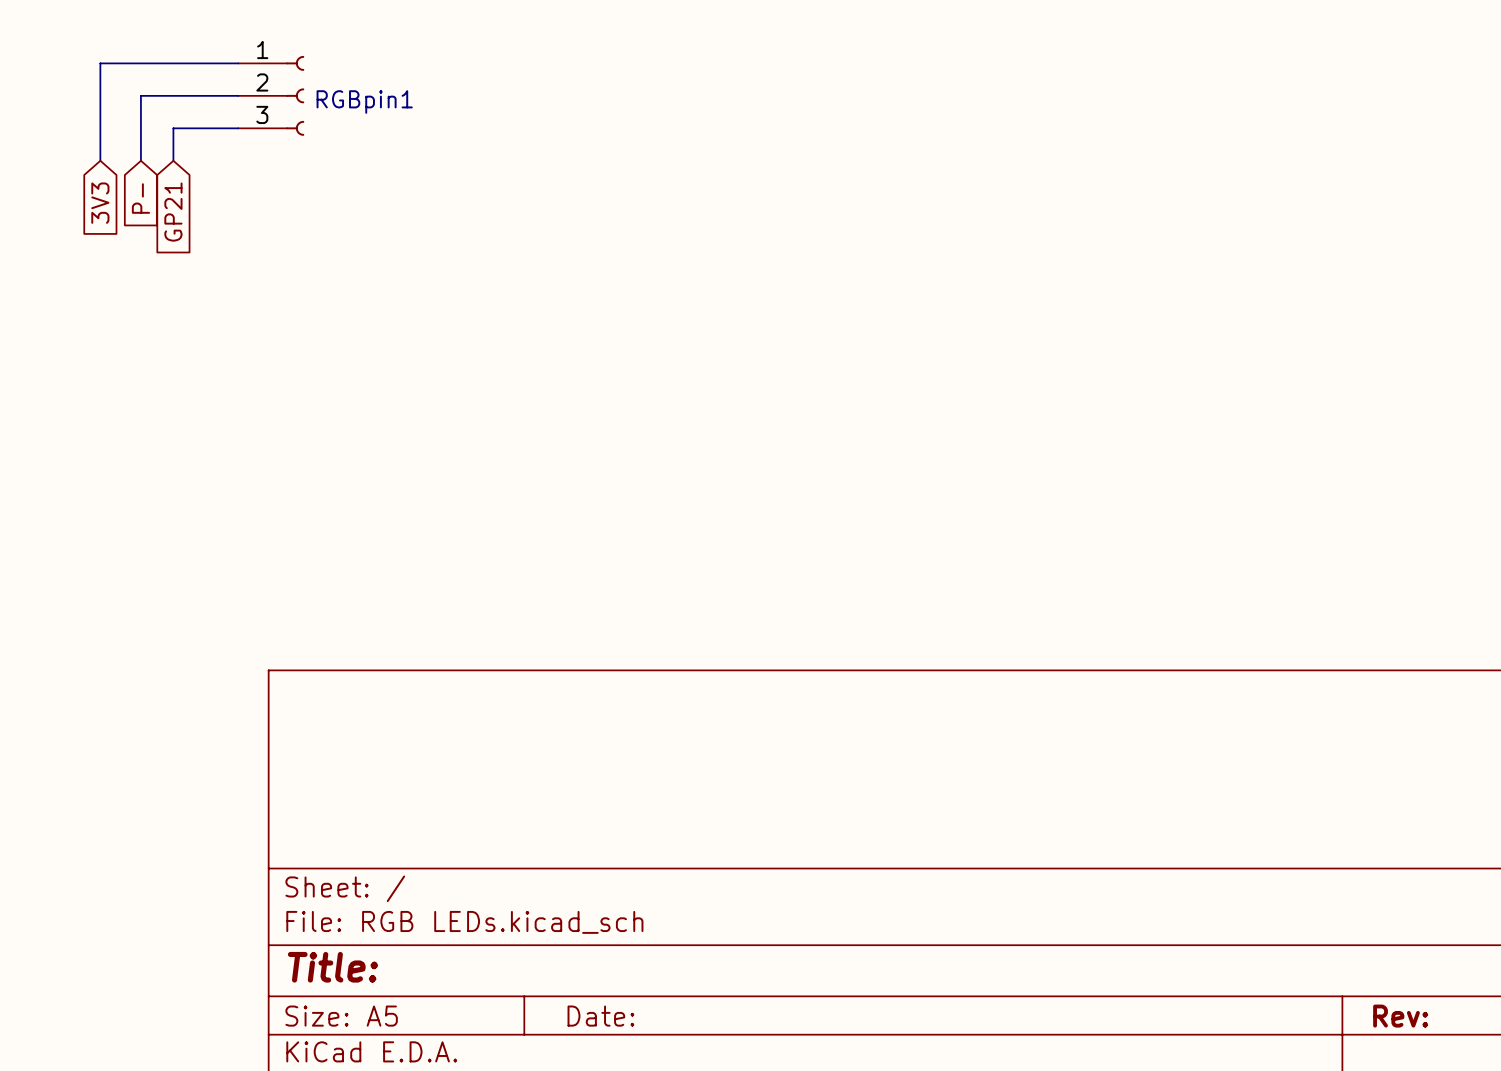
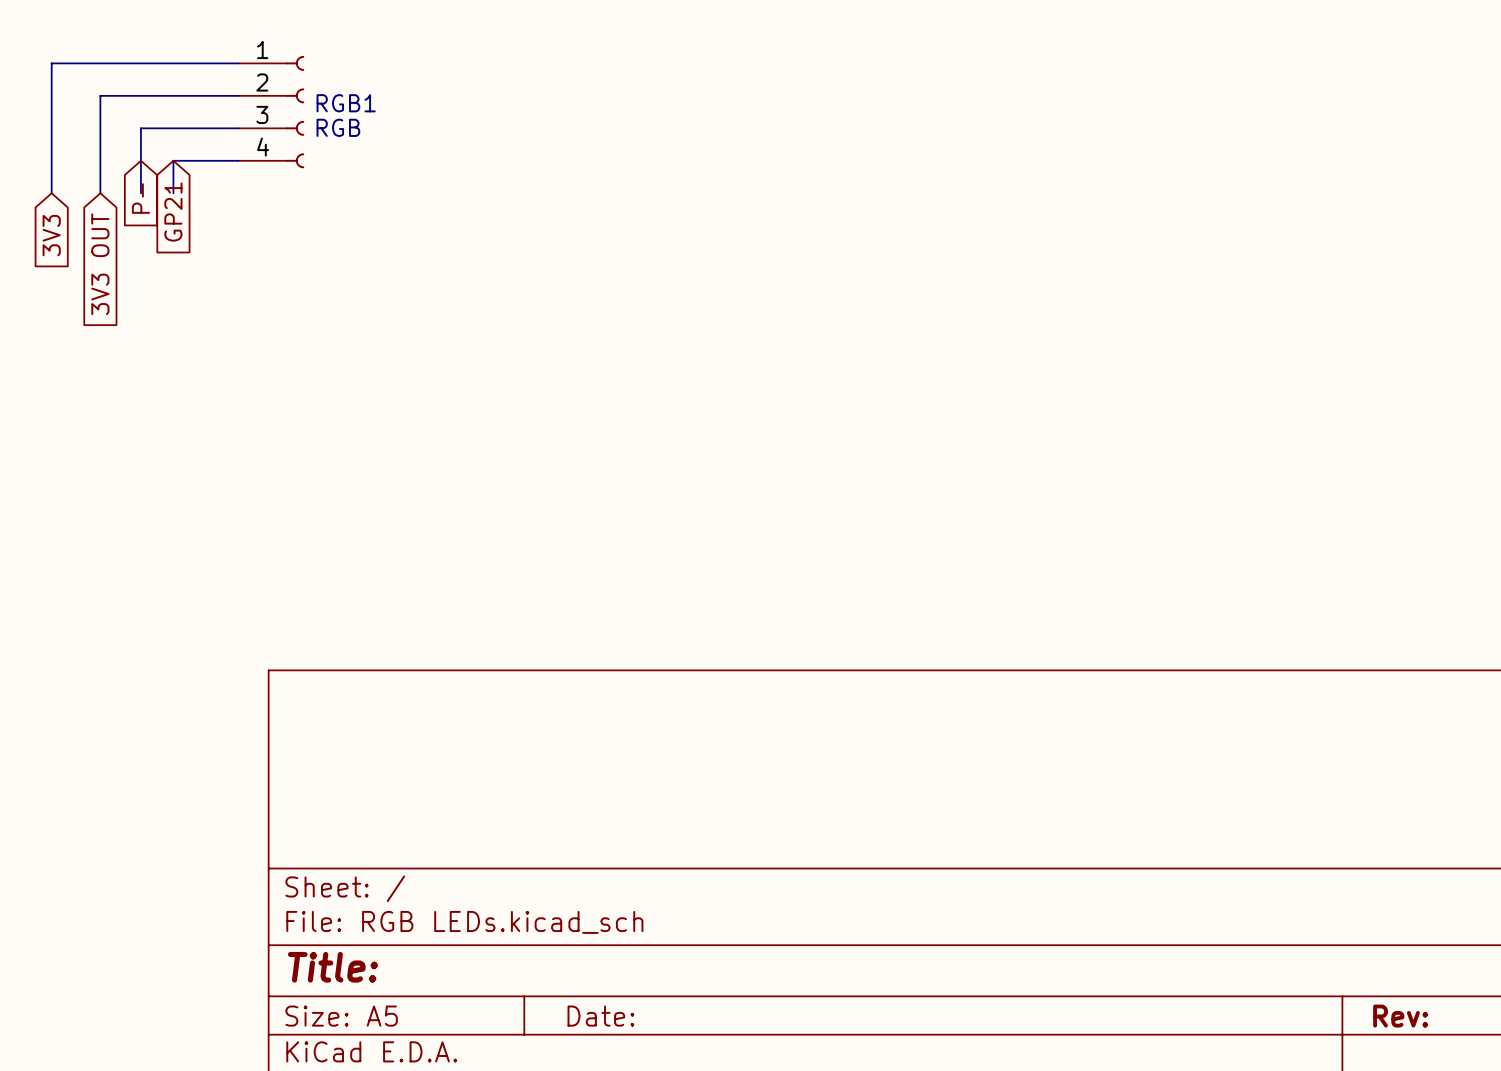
wire: (100, 63) (100, 95) -> (140, 95) (100, 95)
wire: none -> (100, 63) (51, 63) (51, 193)
wire: (140, 95) (140, 128) -> (173, 128) (140, 128)
RGBpin1: (271, 95) -> none
RGB1: none -> RGB (271, 112)
wire: (173, 128) (173, 160) -> (140, 160) (140, 193)
wire: none -> (100, 160) (100, 193)
wire: none -> (238, 160) (173, 160) (173, 193)
global label position: 3V3 (100, 203) -> 3V3 (51, 235)
global label: none -> 3V3 OUT (100, 264)

